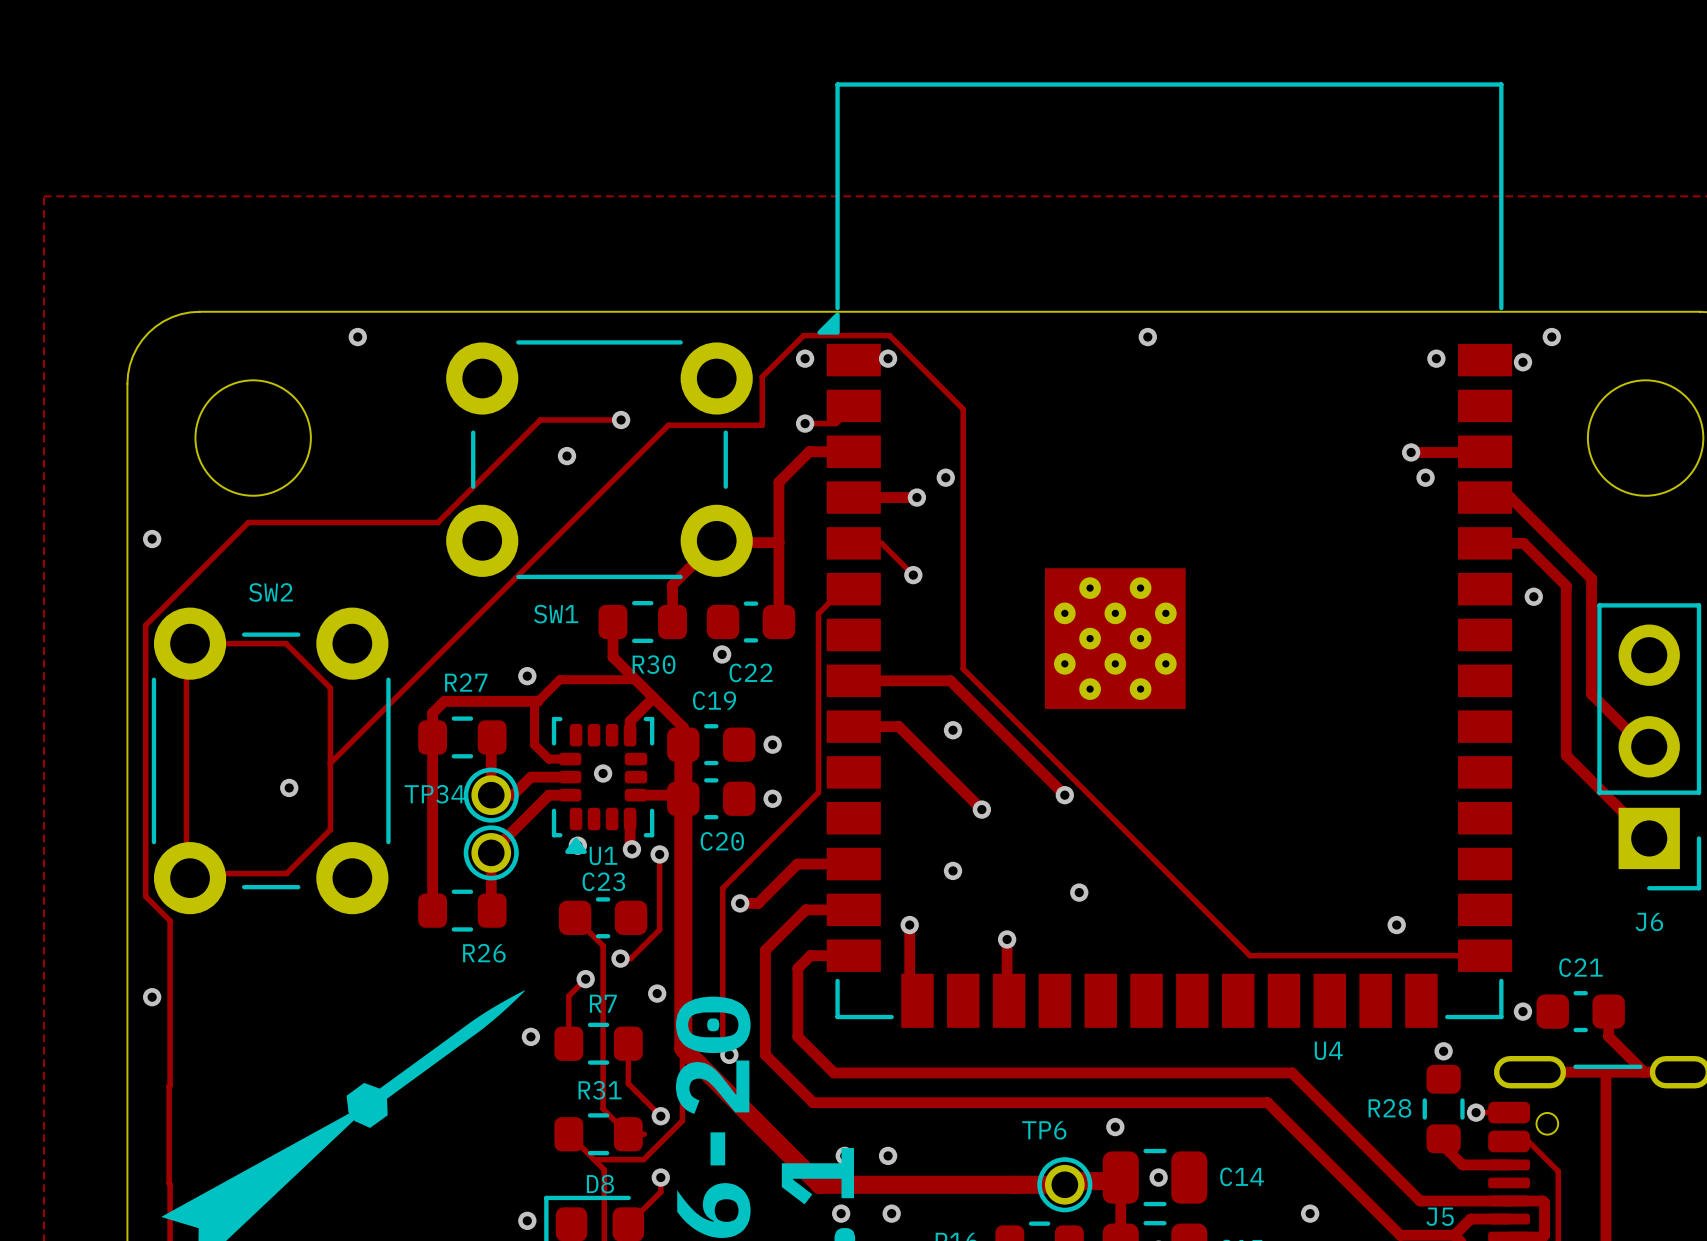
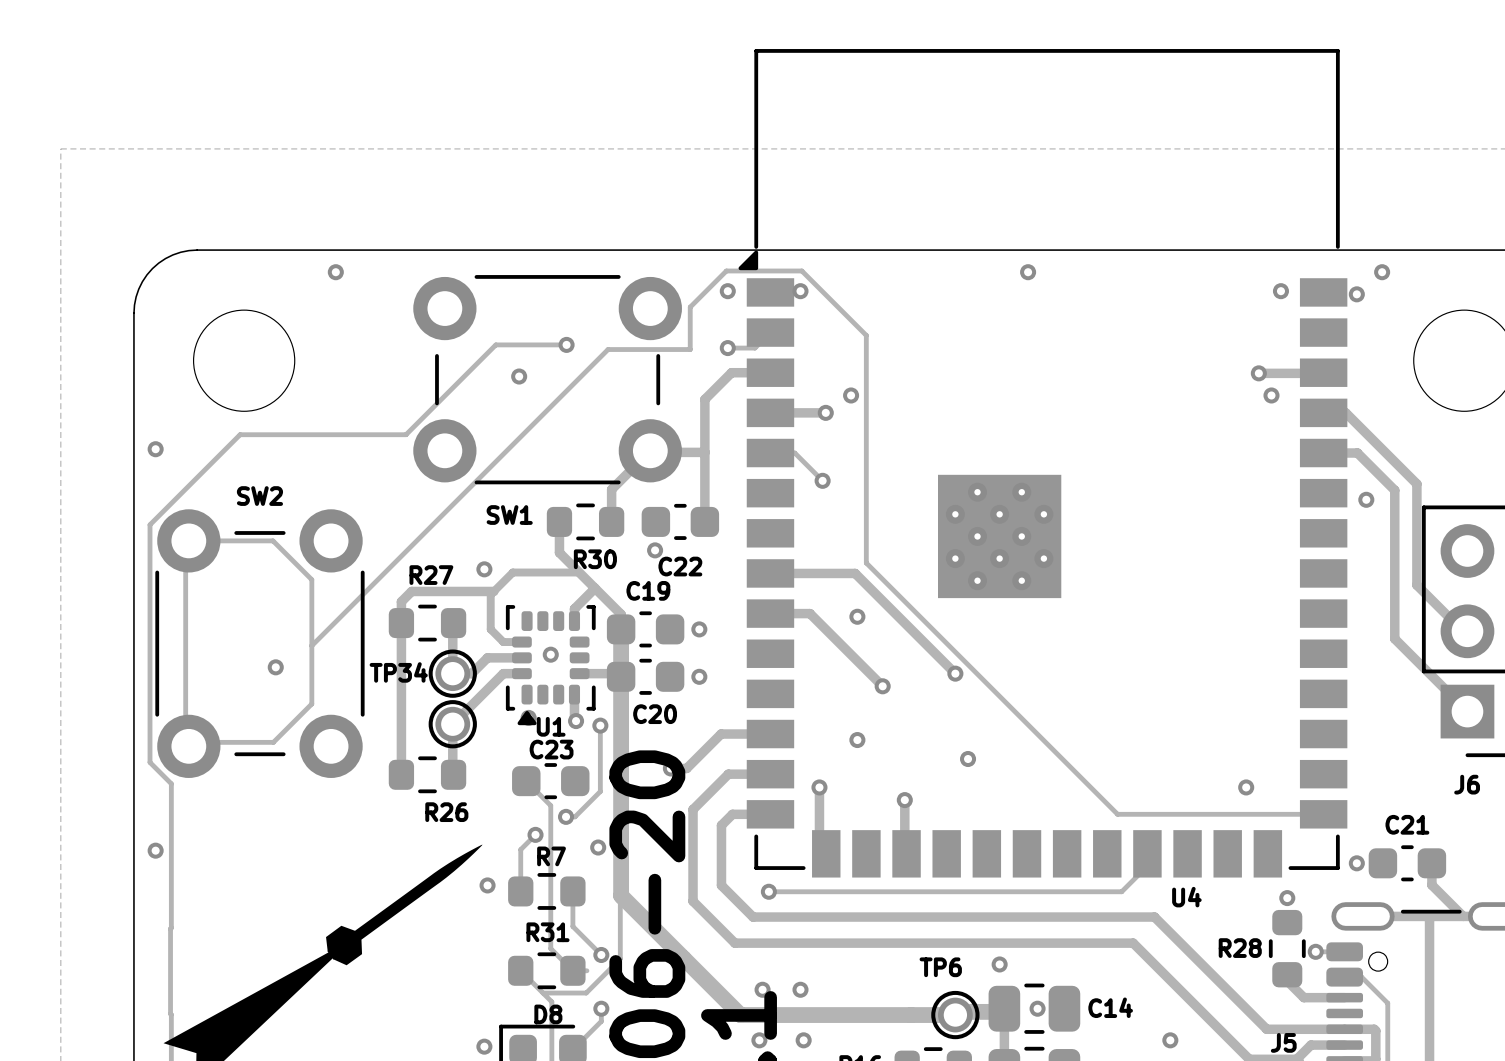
track: (853, 589) (842, 589) (818, 613) (818, 792) (722, 888) (722, 1048) (729, 1054) -> none
track: none -> (1147, 853) (1147, 866) (1121, 891) (768, 891)
via position: (729, 1054) -> (768, 891)

